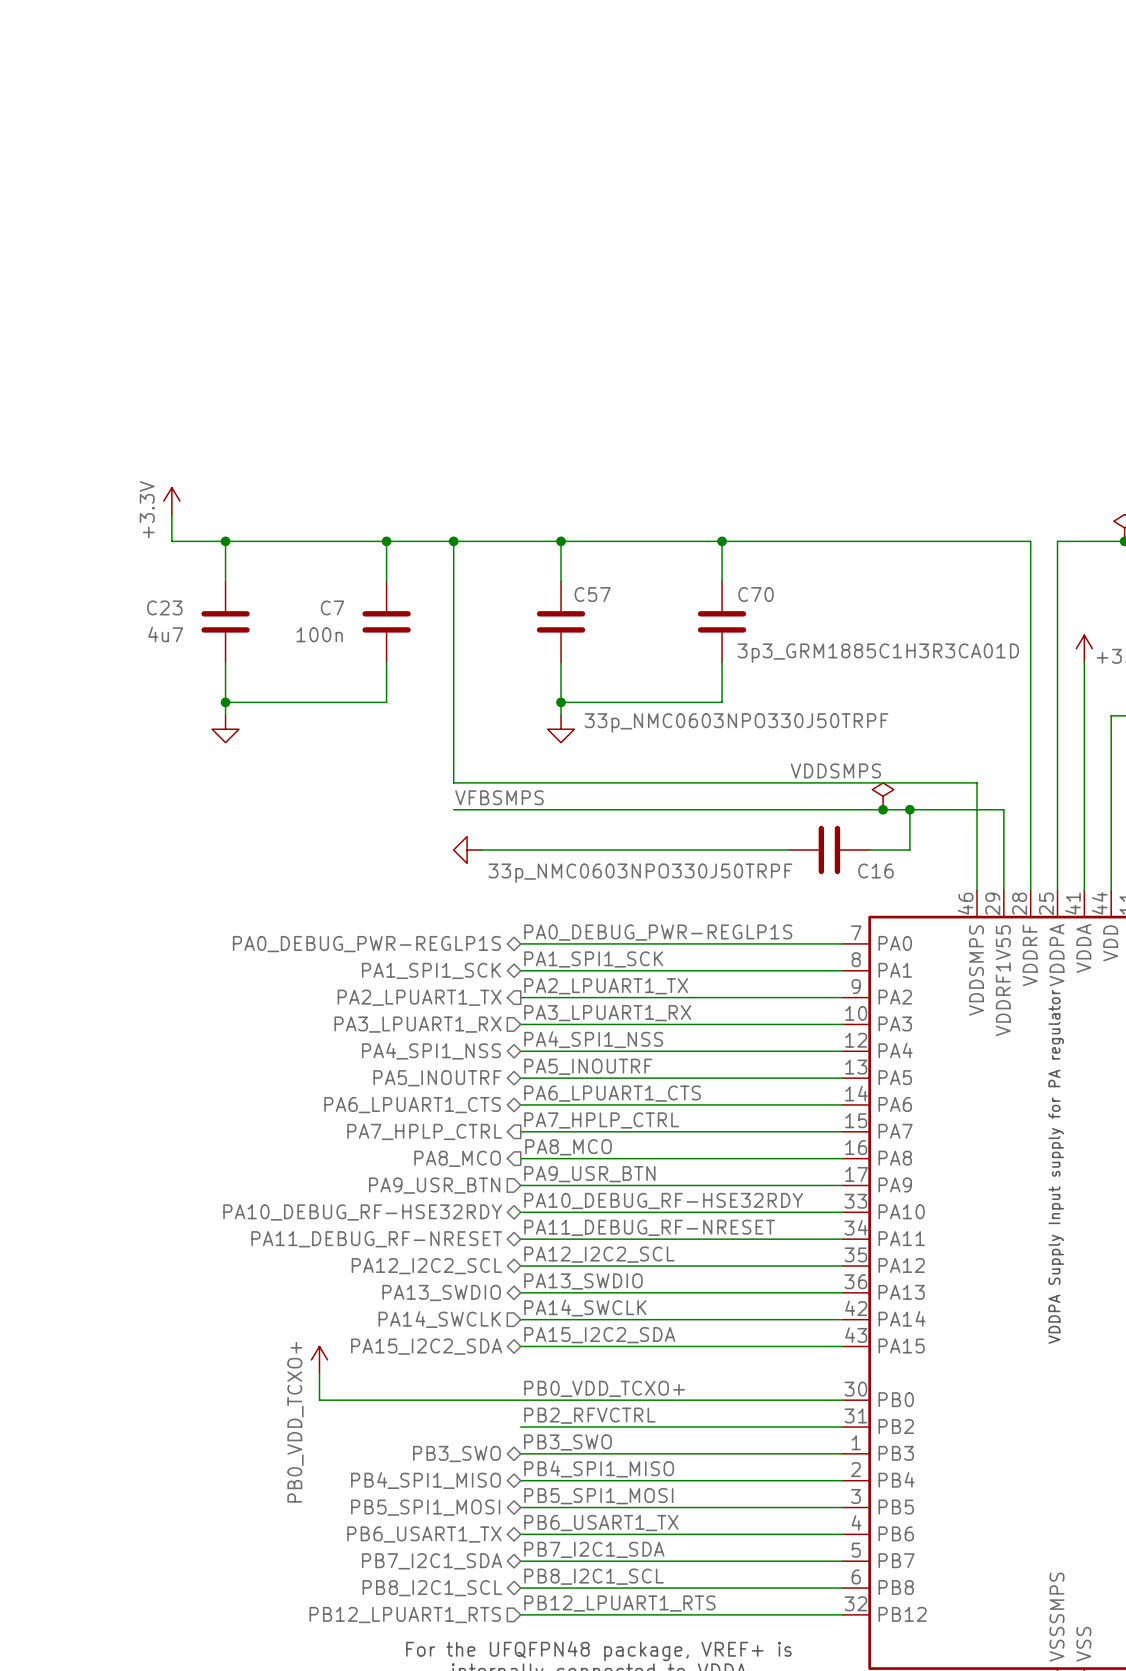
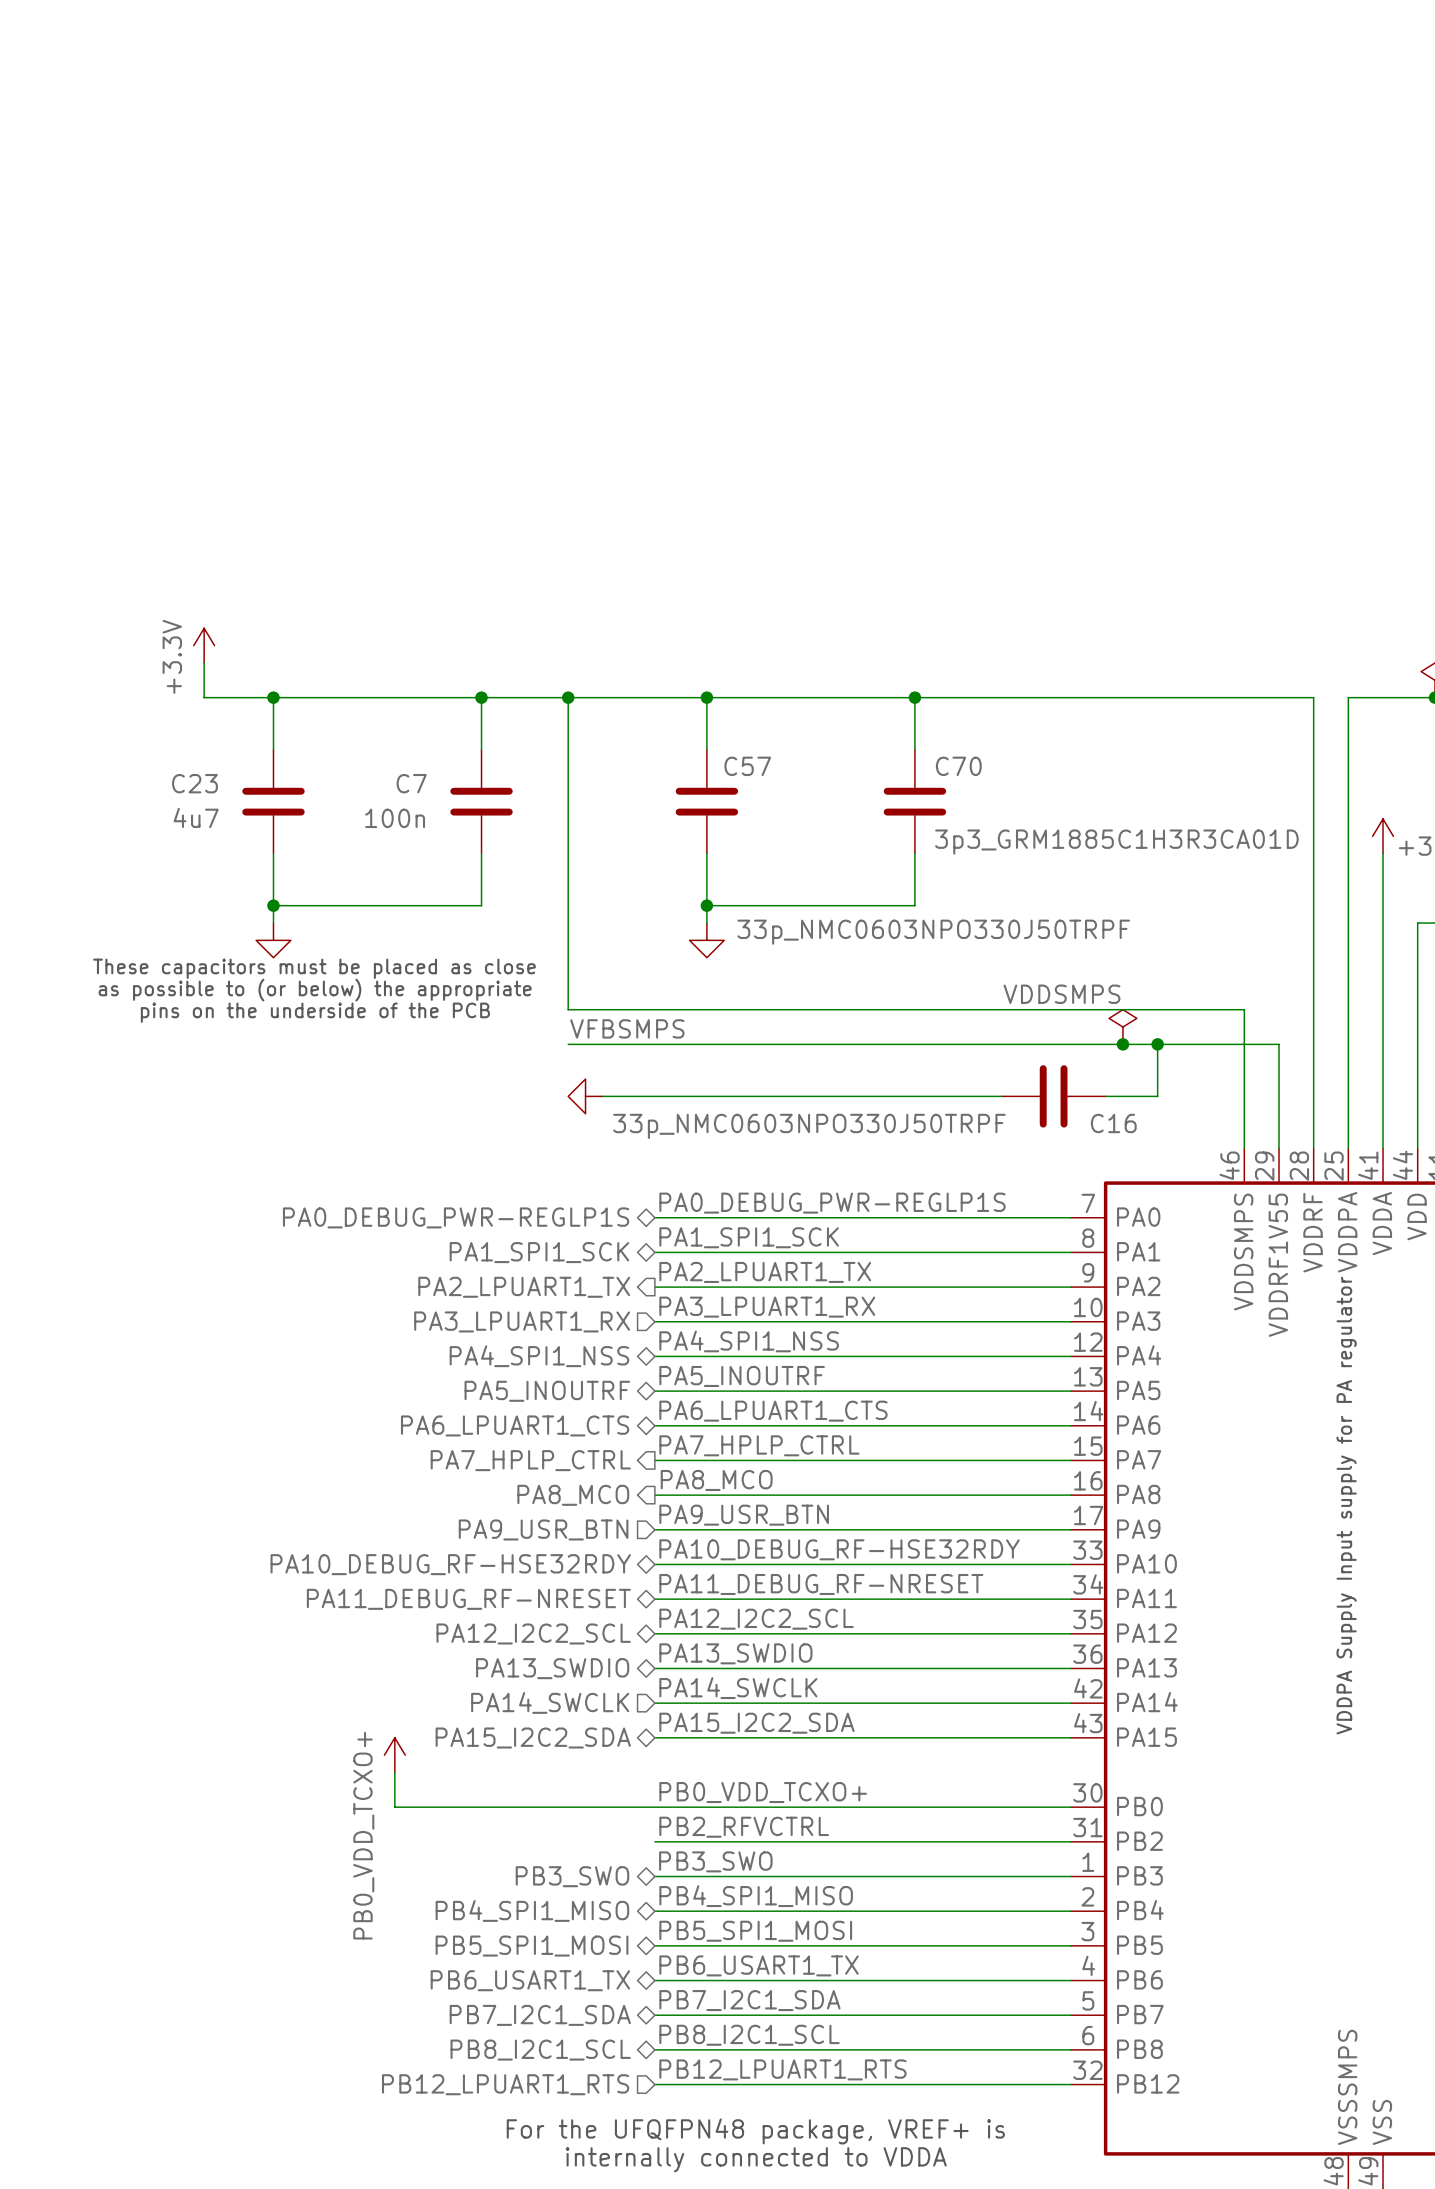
text: none -> These capacitors must be placed as close (314, 968)
text: none -> as possible to (or below) the appropriate (315, 990)
text: none -> pins on the underside of the PCB (315, 1012)

